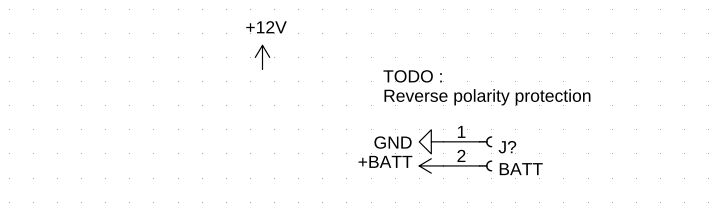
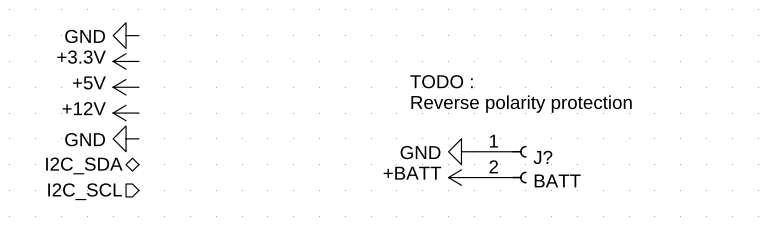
power symbol: none -> GND (126, 35)
power symbol: none -> +3.3V (126, 61)
power symbol rotation: 0° (262, 57) -> 90° counterclockwise (126, 113)
power symbol position: +12V (262, 57) -> +12V (126, 113)
power symbol: none -> +5V (126, 87)
power symbol: none -> GND (126, 138)
hierarchical label: none -> I2C_SDA (84, 165)
hierarchical label: none -> I2C_SCL (85, 191)

